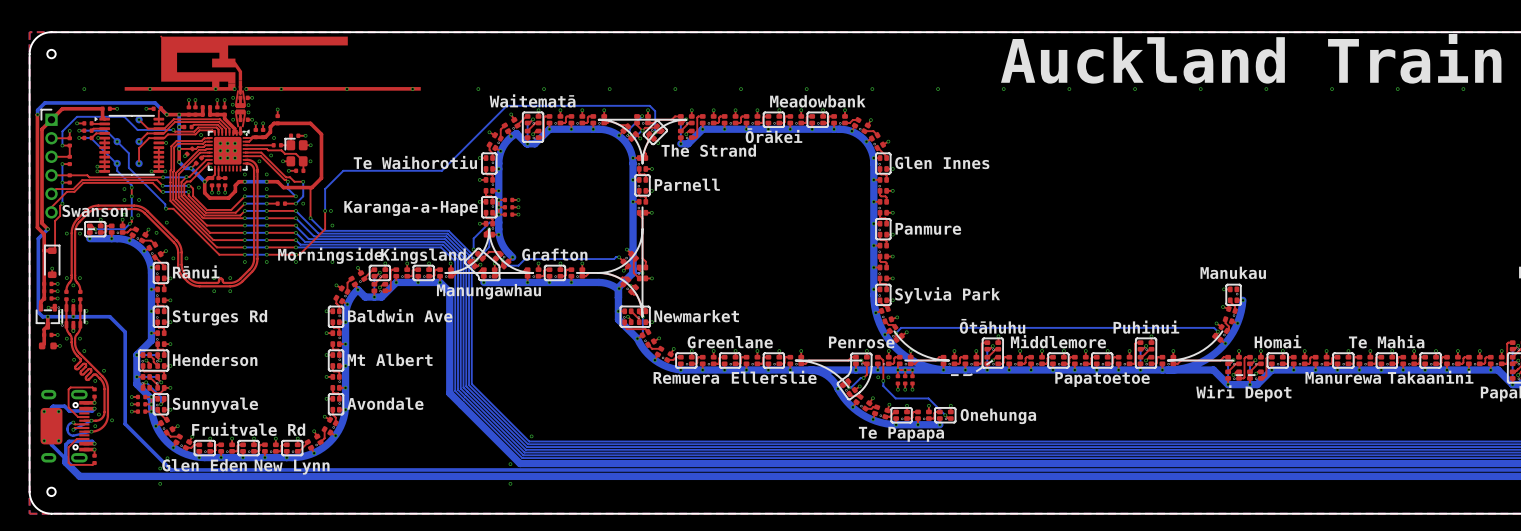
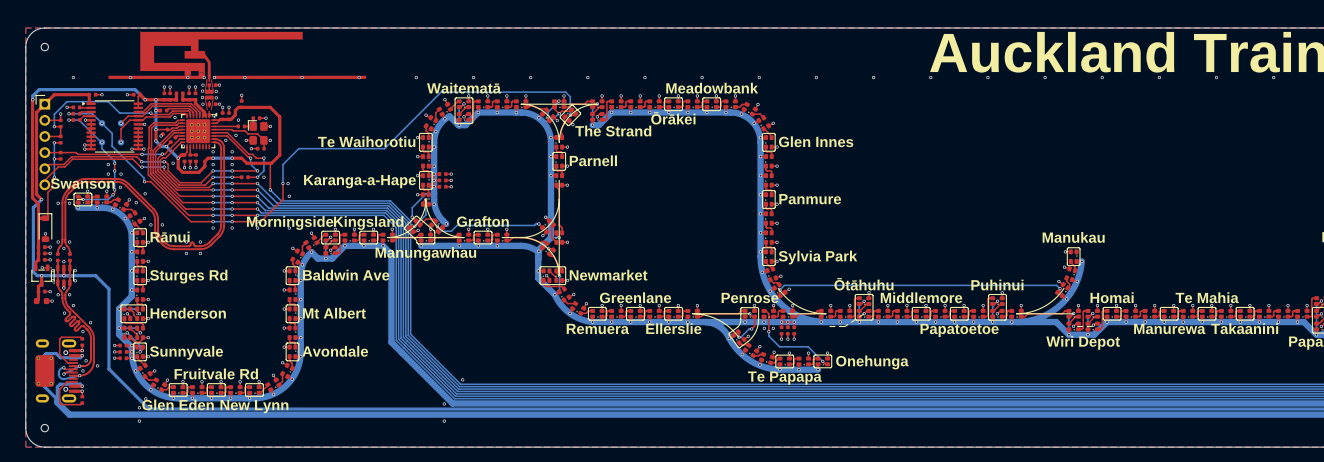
top track: (139, 119) (147, 128) (158, 128) -> none
part: (139, 119) -> none
via: (139, 119) -> none

